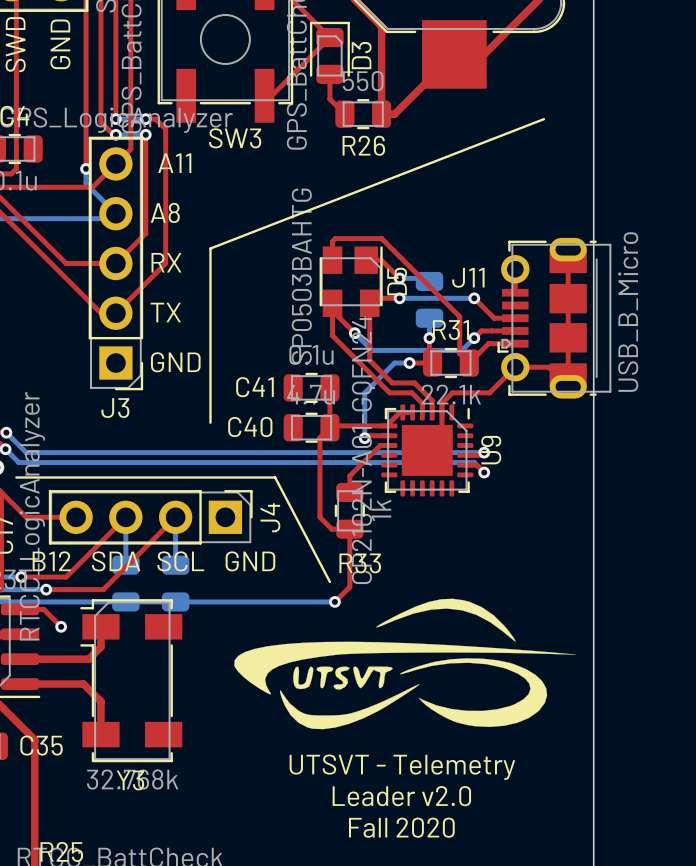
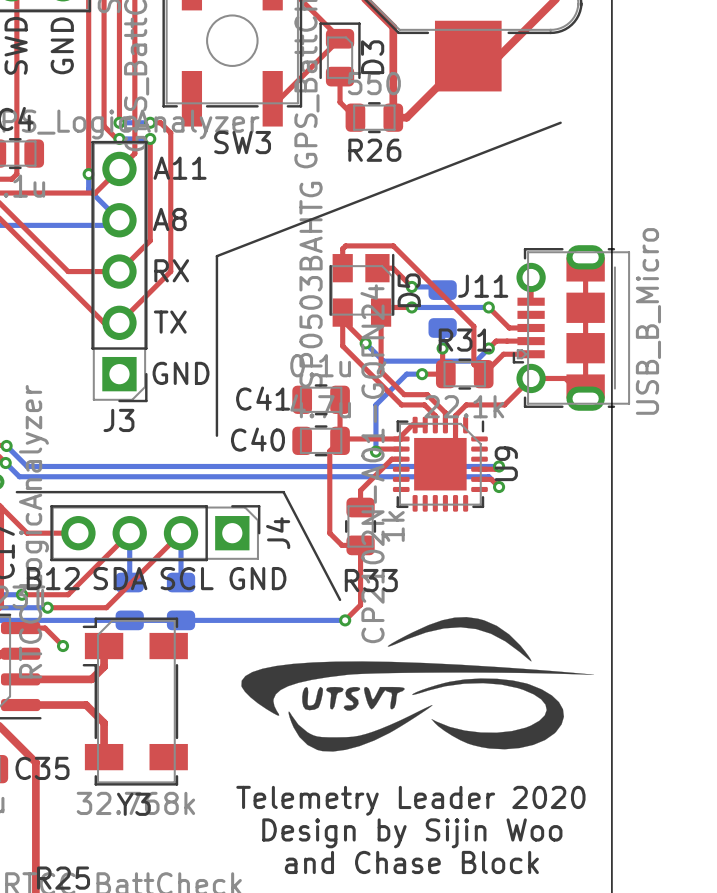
text: UTSVT - Telemetry (402, 767) -> Telemetry Leader 2020 (410, 800)
text: Leader v2.0 (401, 796) -> Design by Sijin Woo (412, 833)
text: Fall 2020 (401, 827) -> and Chase Block (411, 862)

